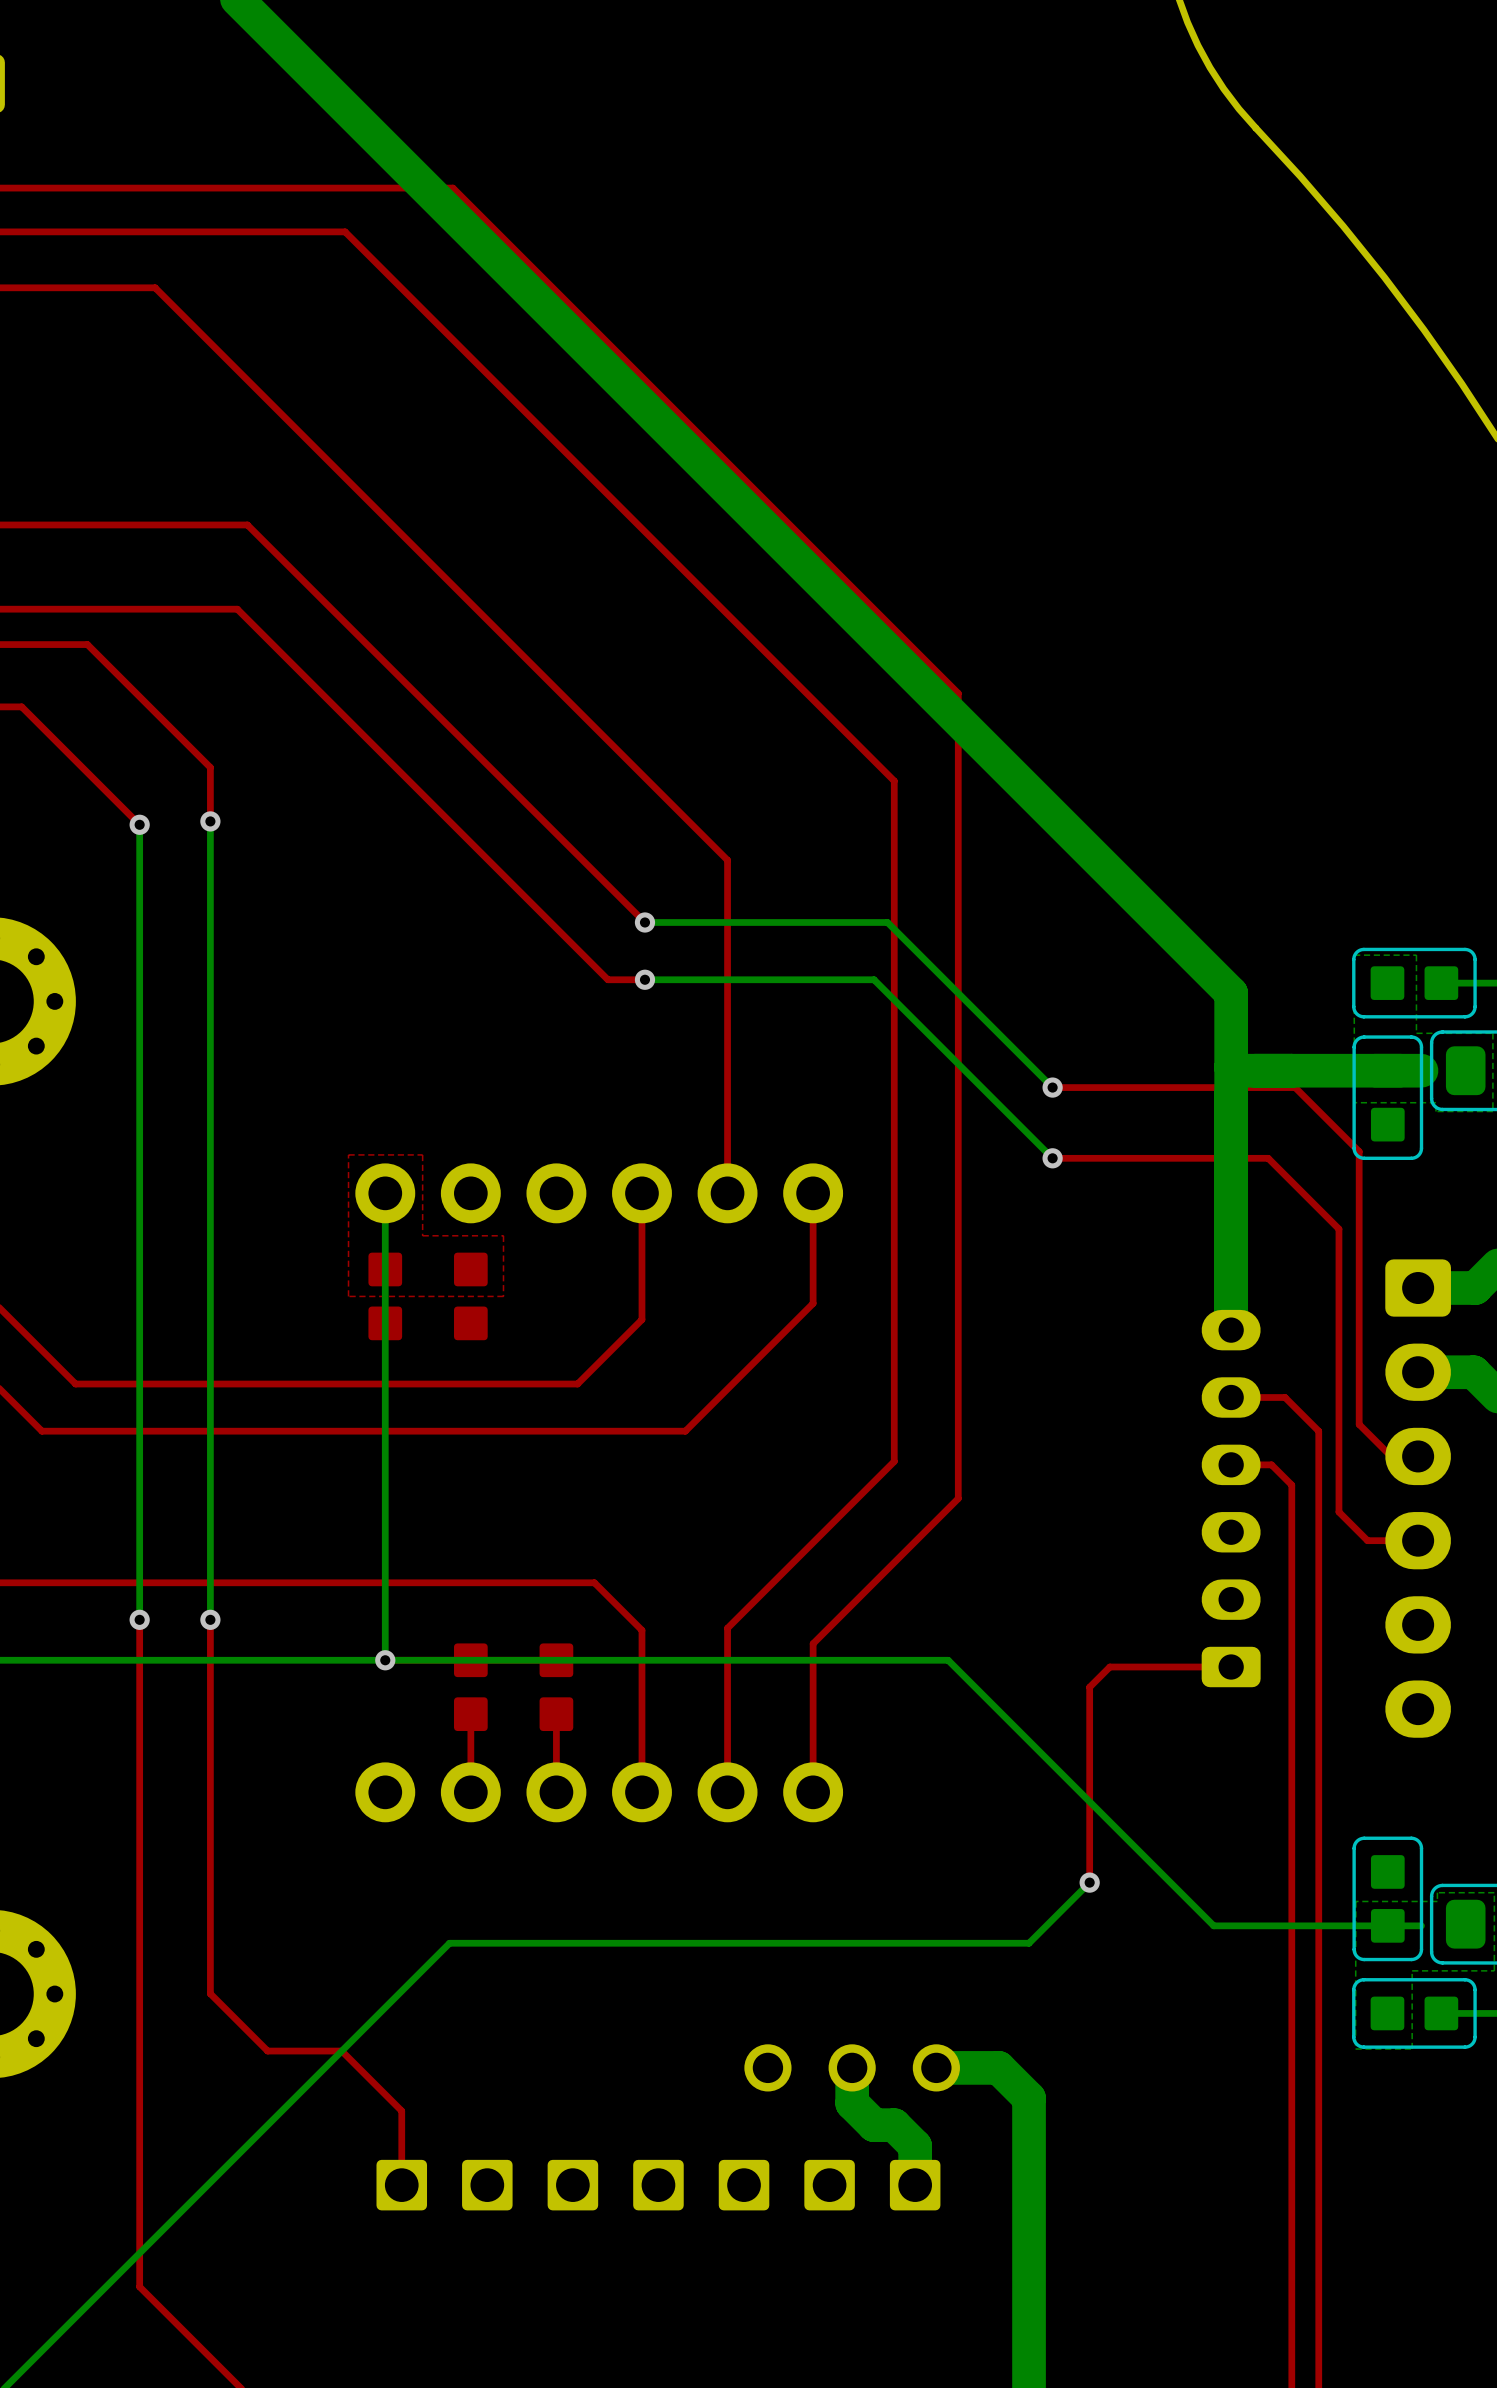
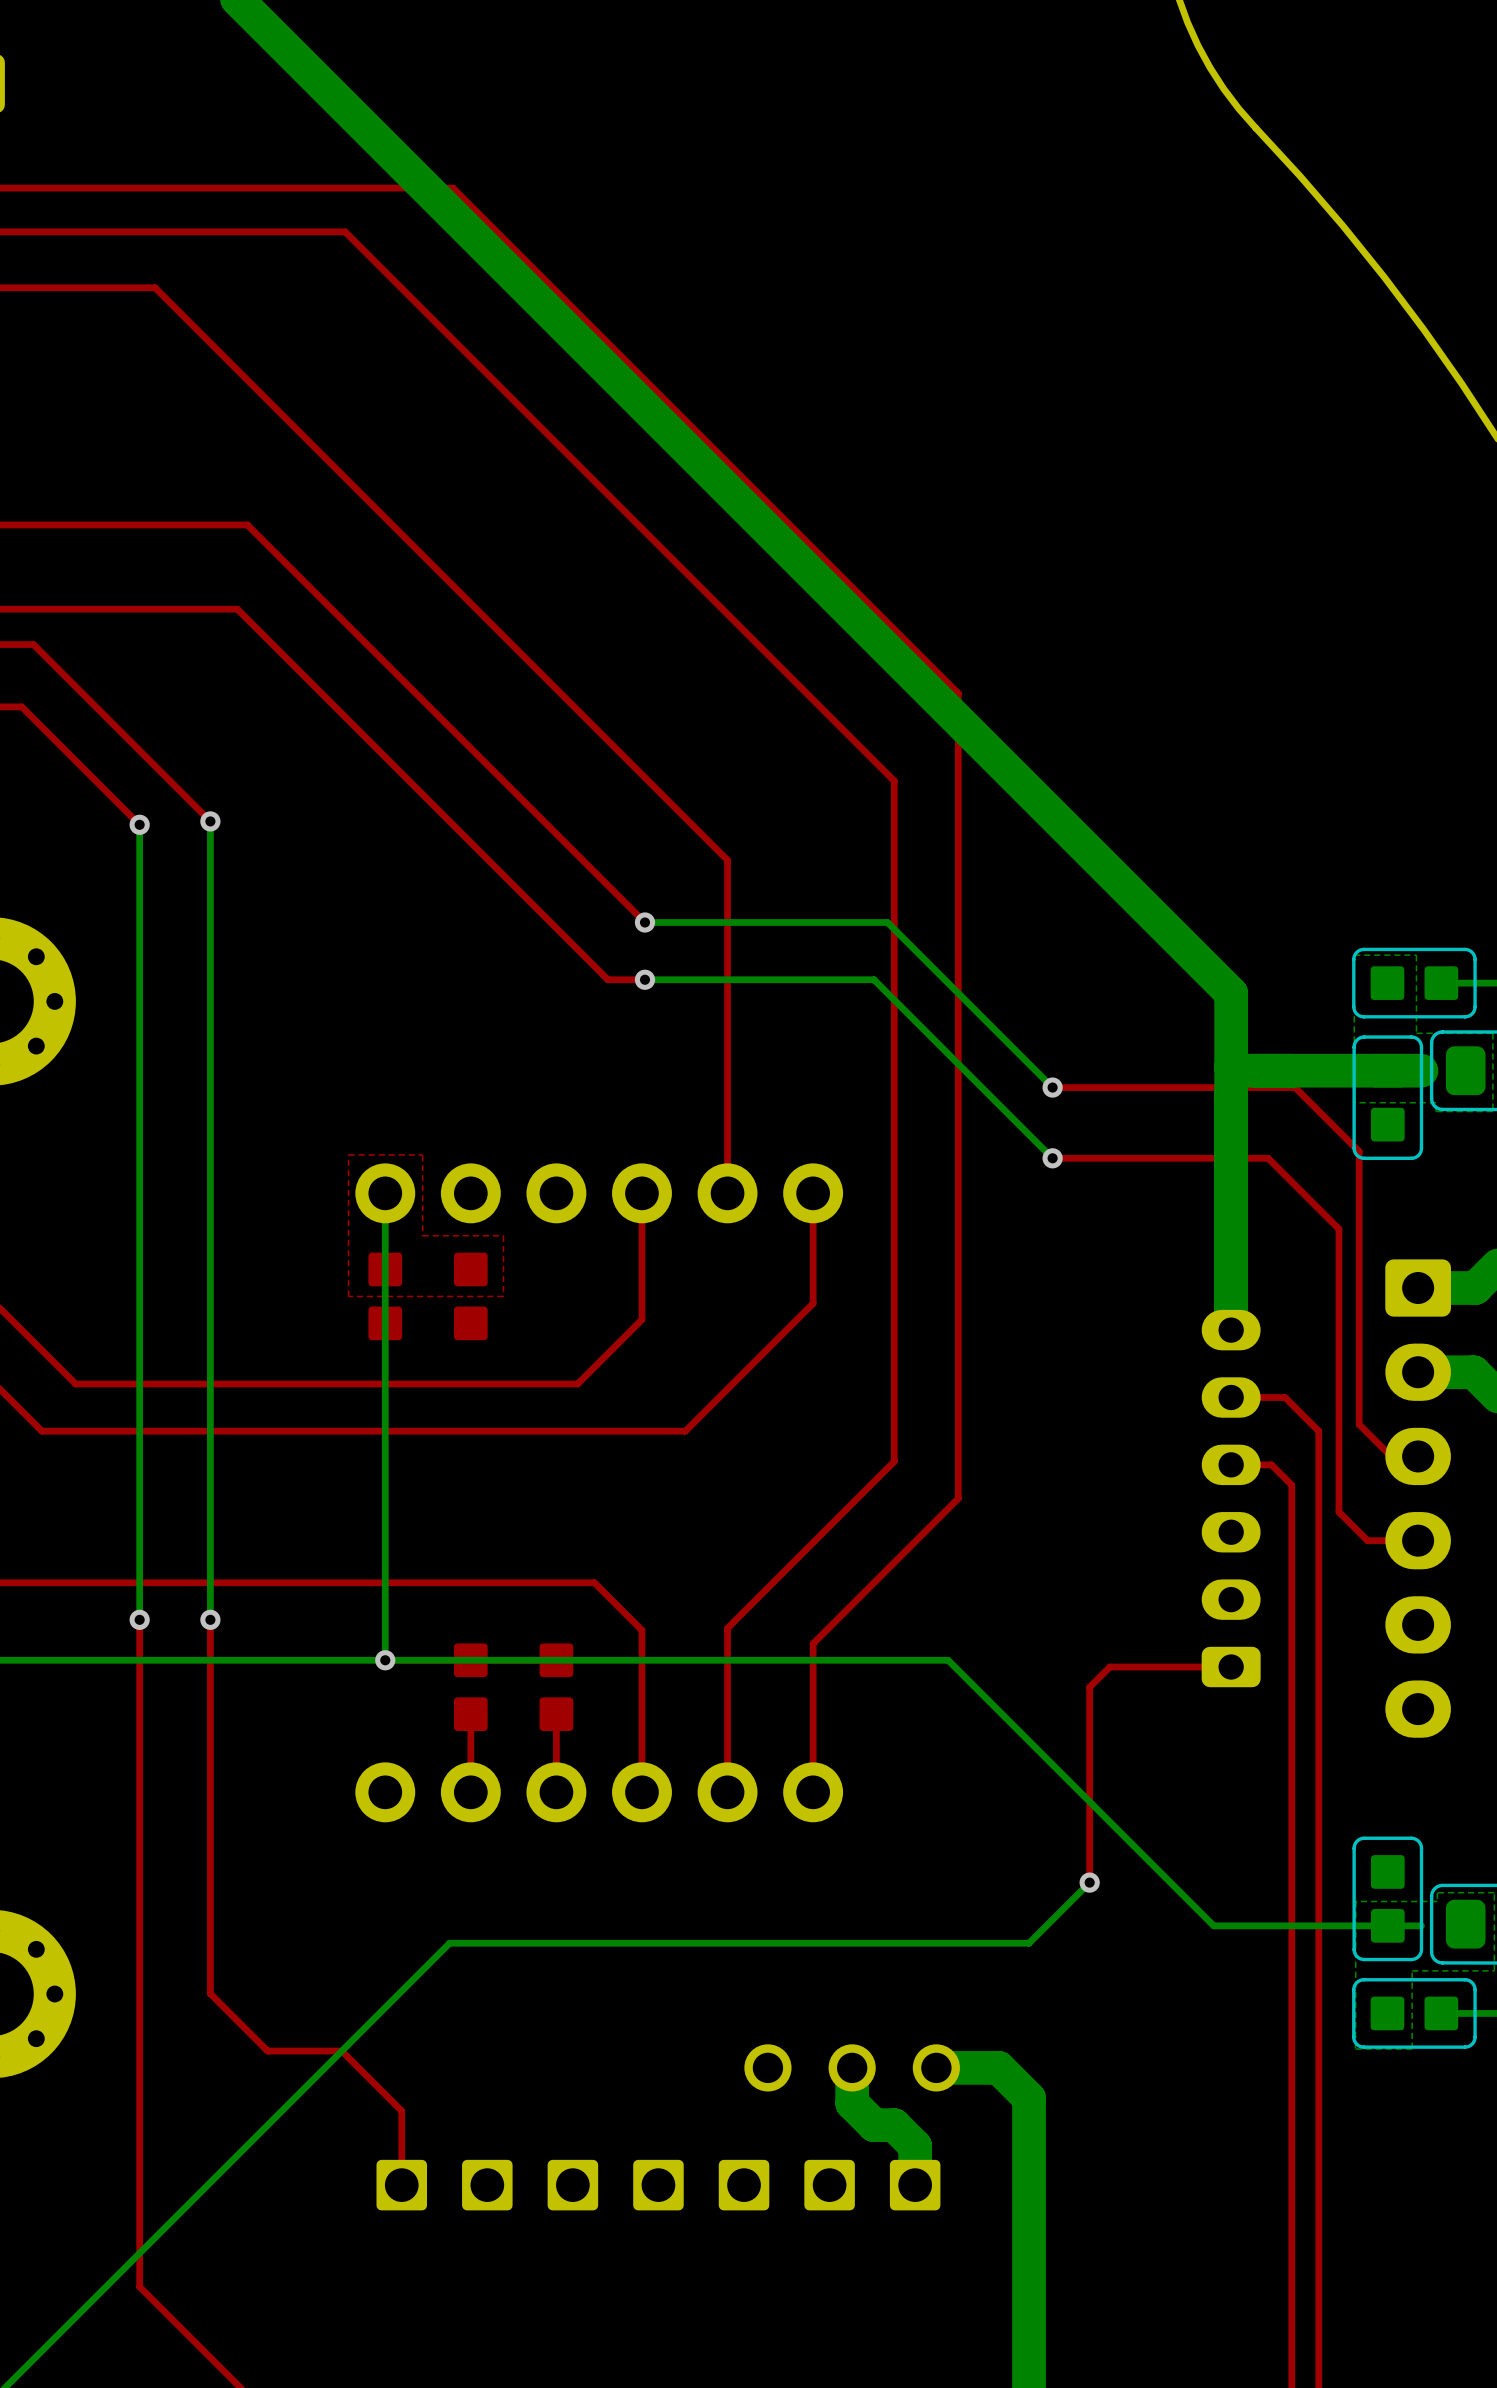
top track: (33, 644) (87, 644) (210, 767) (210, 821) -> (33, 644) (210, 821)

